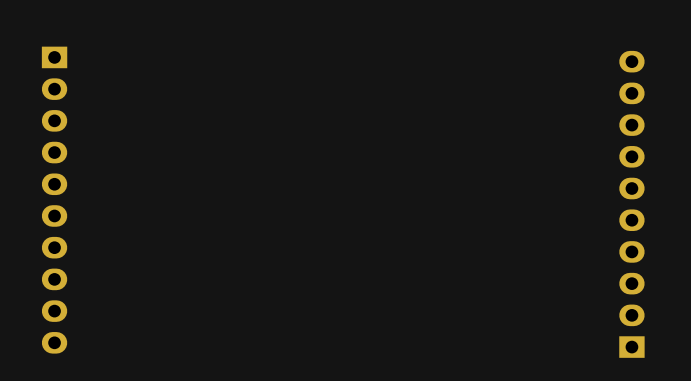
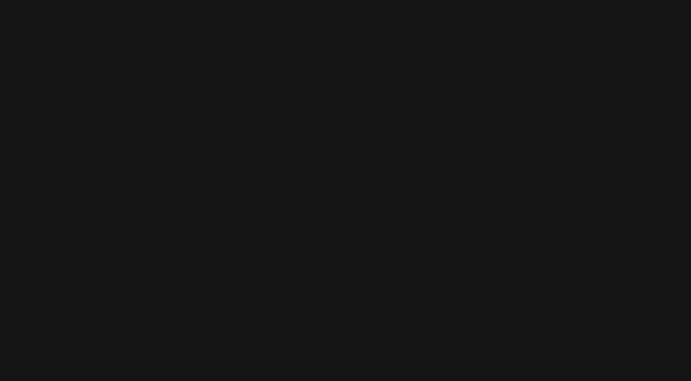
part: (54, 200) -> none
part: (631, 204) -> none

